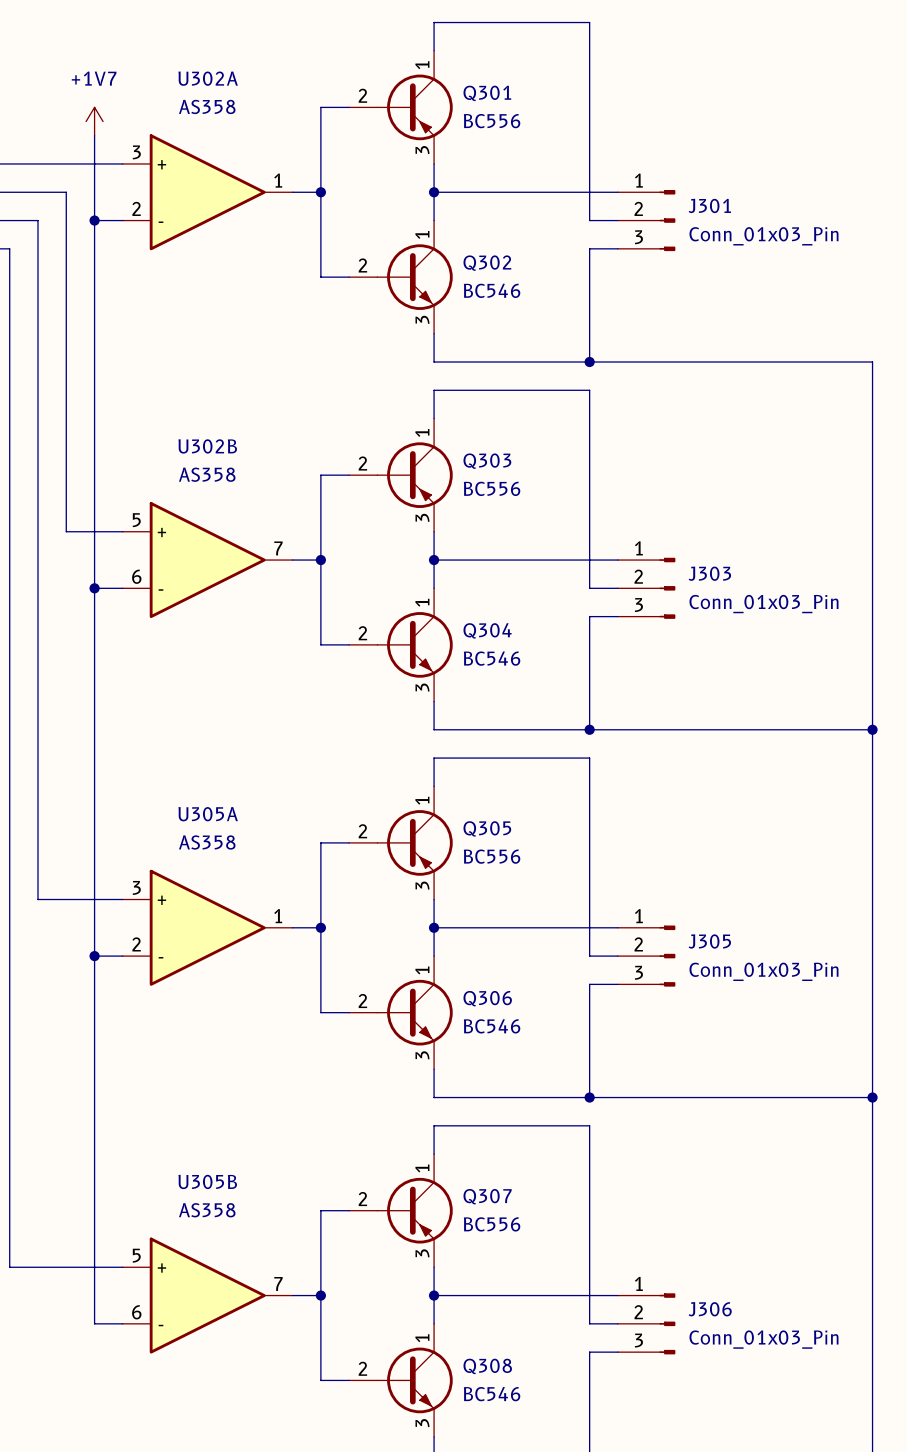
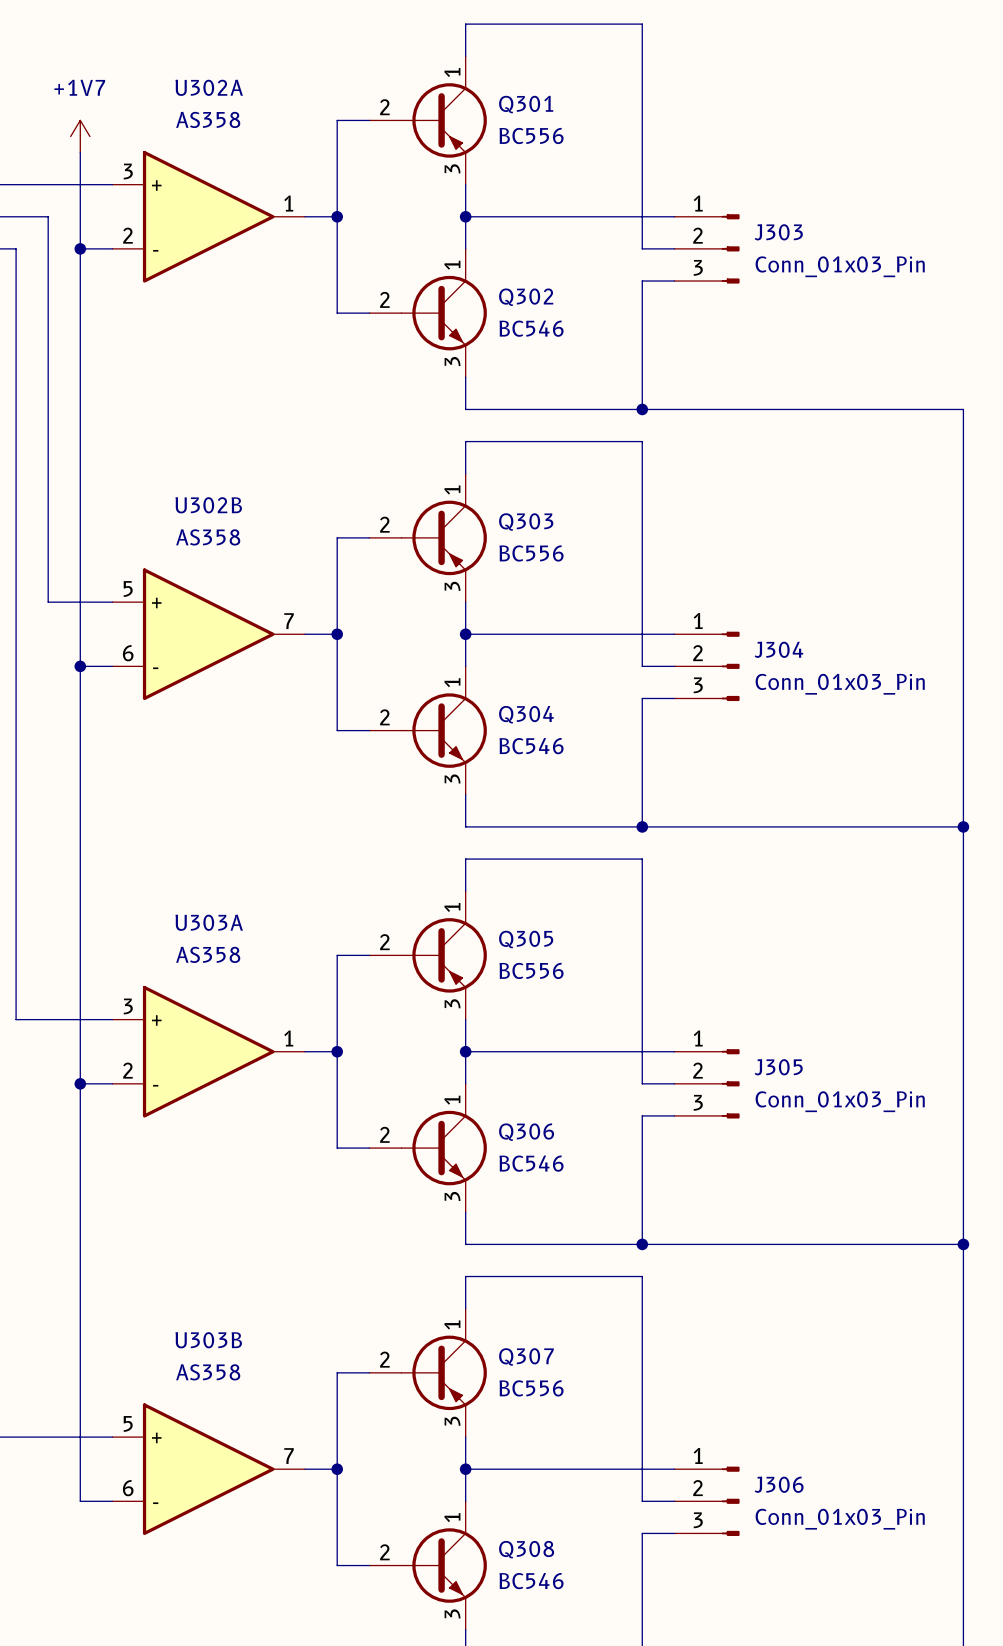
J301 name: J301 (709, 205) -> J303 (778, 232)
J303 name: J303 (709, 573) -> J304 (778, 649)
U305A name: U305A (208, 814) -> U303A (209, 922)
U305B name: U305B (207, 1181) -> U303B (208, 1340)

